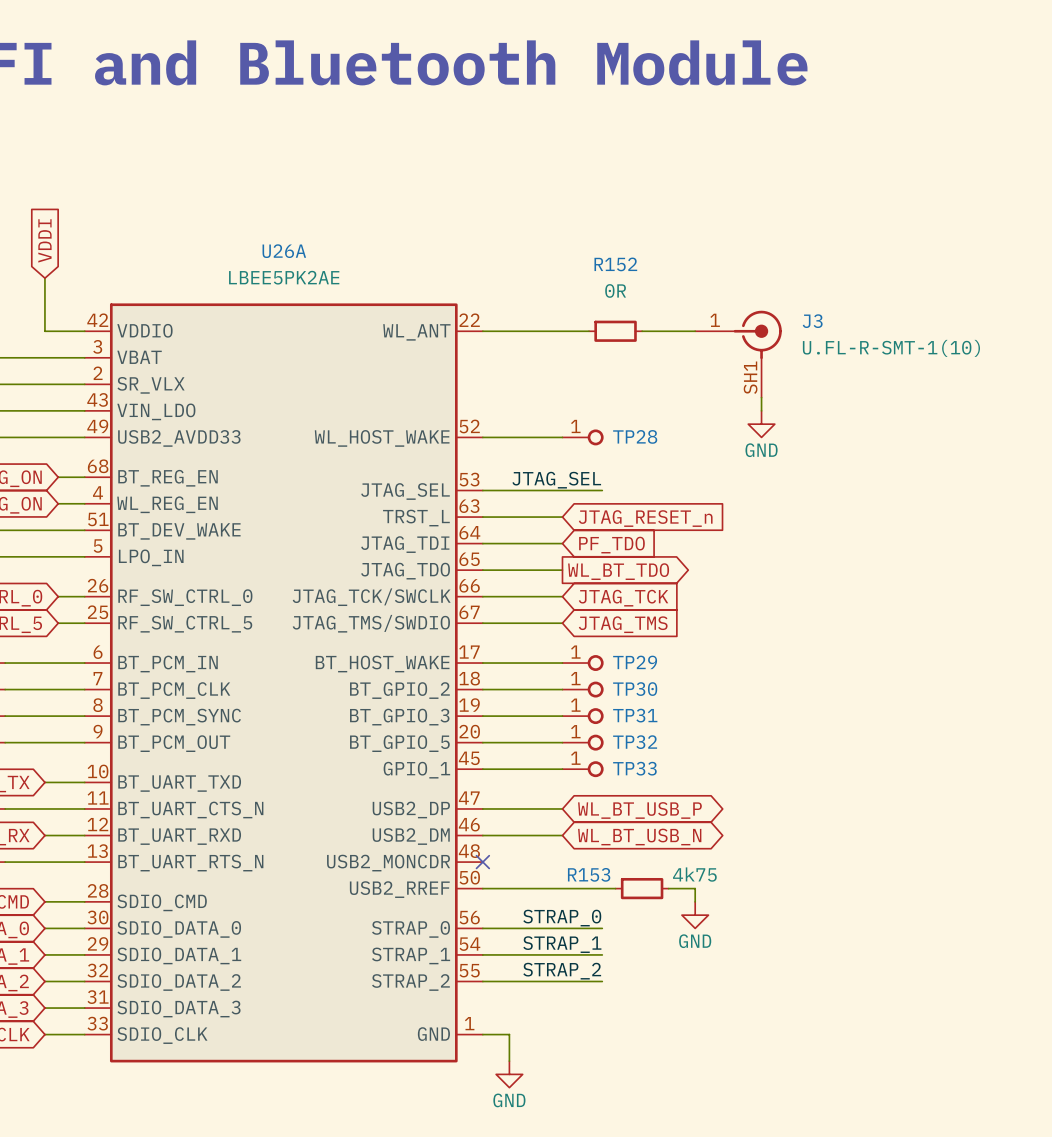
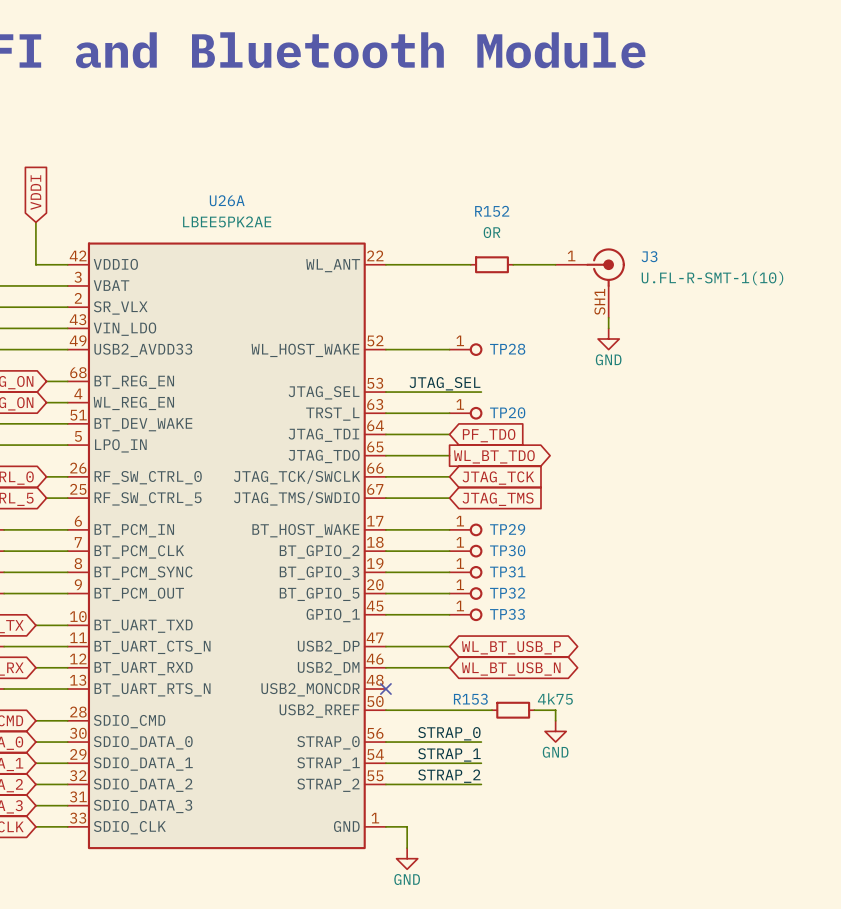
TP20: none -> (466, 413)
global label: JTAG_RESET_n (645, 518) -> none

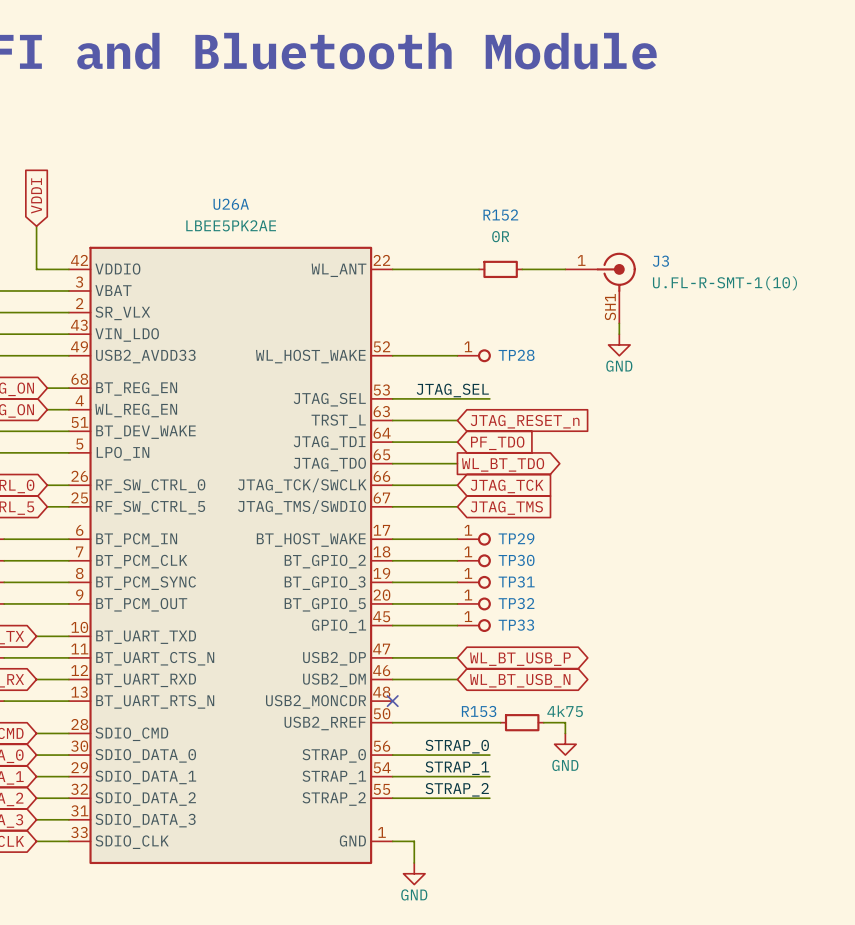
TP20: (466, 413) -> none
global label: none -> JTAG_RESET_n (525, 421)

